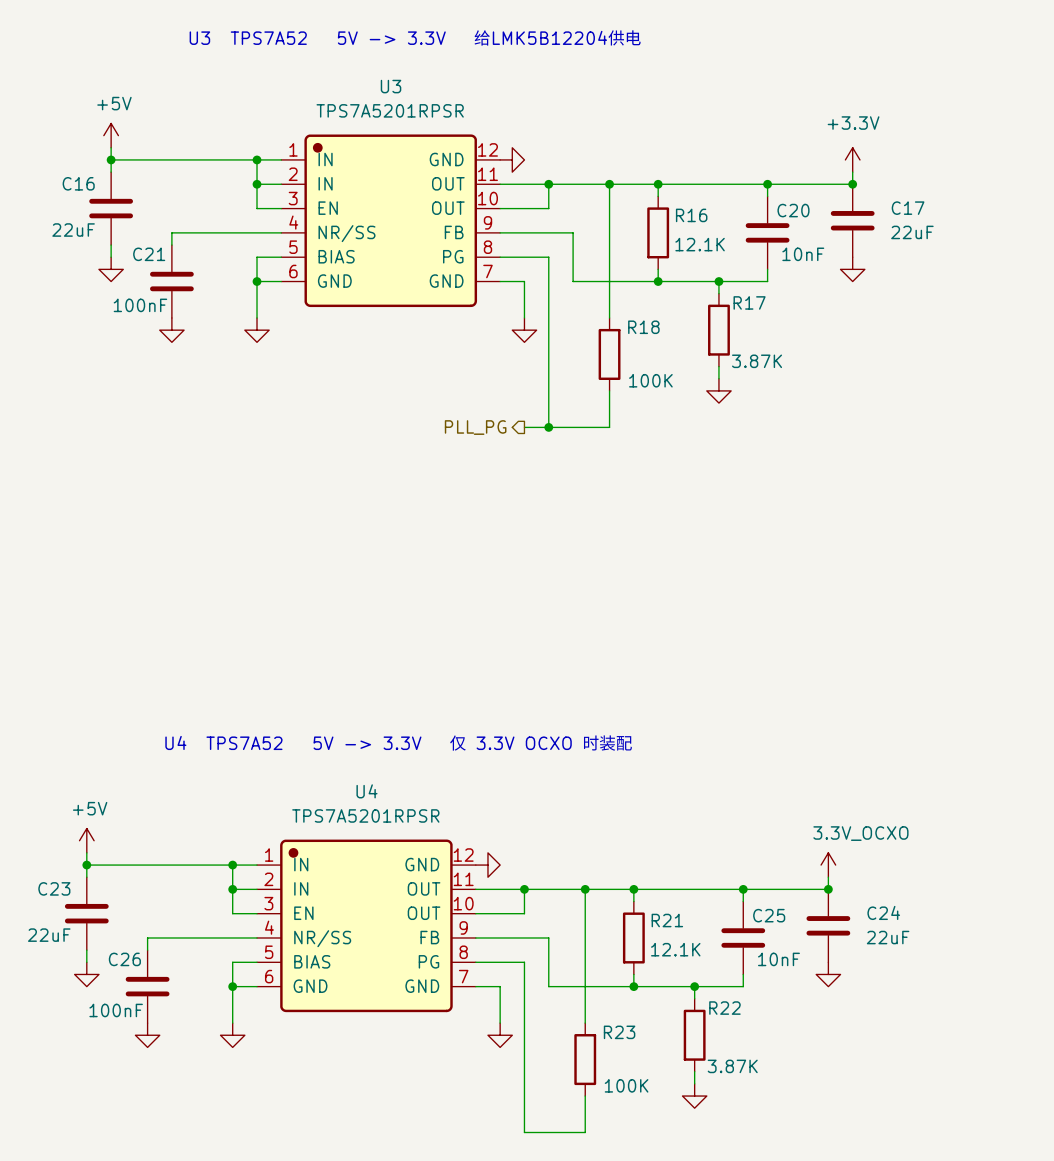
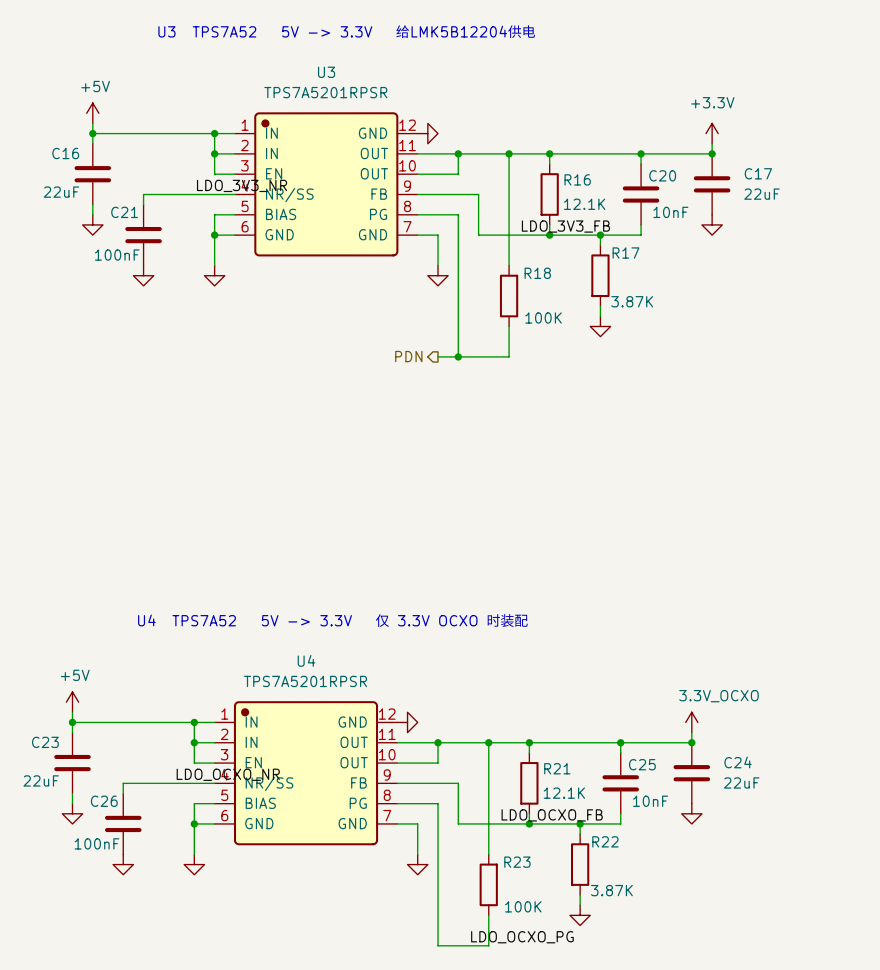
label: none -> LDO_3V3_NR (242, 185)
label: none -> LDO_3V3_FB (565, 226)
hierarchical label: PLL_PG (475, 427) -> PDN (408, 356)
label: none -> LDO_OCXO_NR (228, 774)
label: none -> LDO_OCXO_FB (552, 815)
label: none -> LDO_OCXO_PG (522, 937)

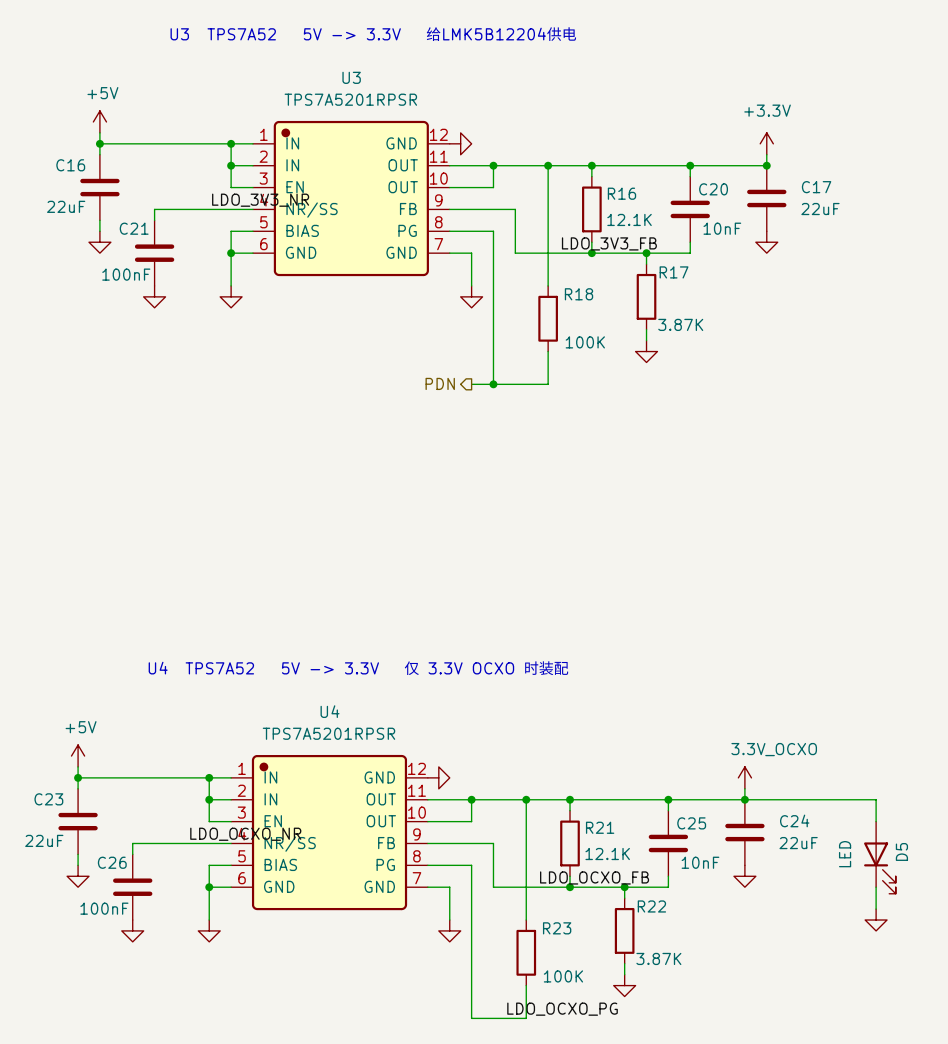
wire: none -> (744, 799) (876, 799) (876, 821)
D5: none -> LED (879, 857)
wire: none -> (876, 887) (876, 909)
power symbol: none -> (876, 920)

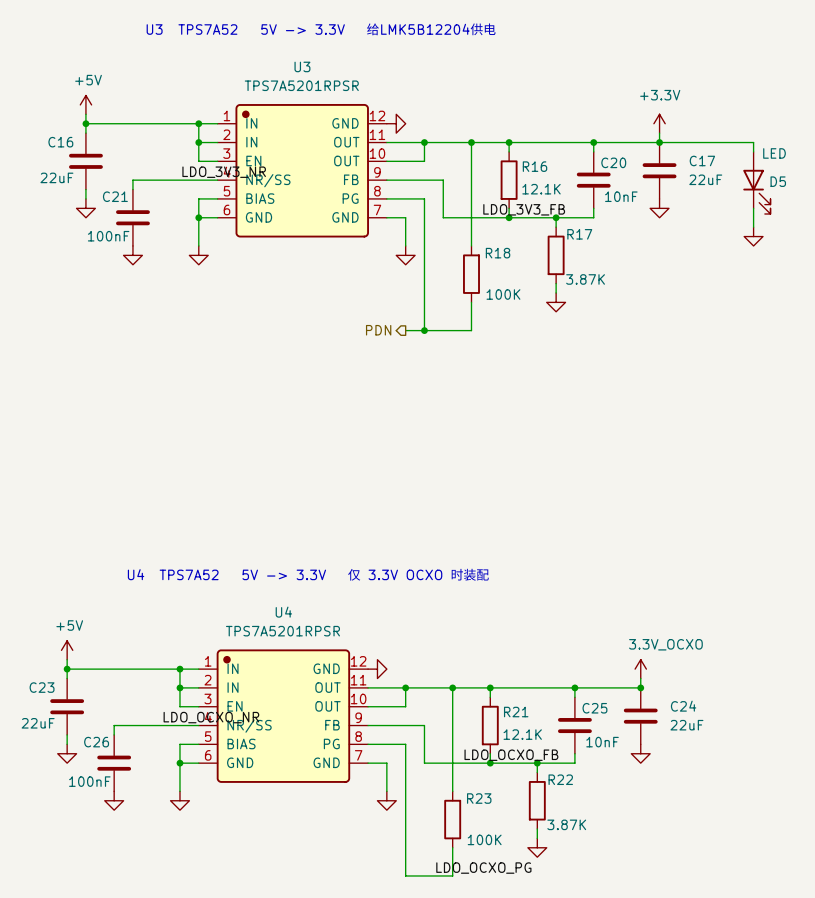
wire: none -> (659, 142) (753, 142) (753, 151)
wire: none -> (753, 208) (753, 227)
power symbol: none -> (753, 236)
wire: (744, 799) (876, 799) (876, 821) -> none
D5 name rotation: 0° (901, 851) -> 90° clockwise (778, 181)
D5 value rotation: 0° (845, 854) -> 90° clockwise (774, 153)
D5 value position: LED (845, 854) -> LED (774, 153)
D5 position: (879, 857) -> (756, 182)
wire: (876, 887) (876, 909) -> none
power symbol: (876, 920) -> none

